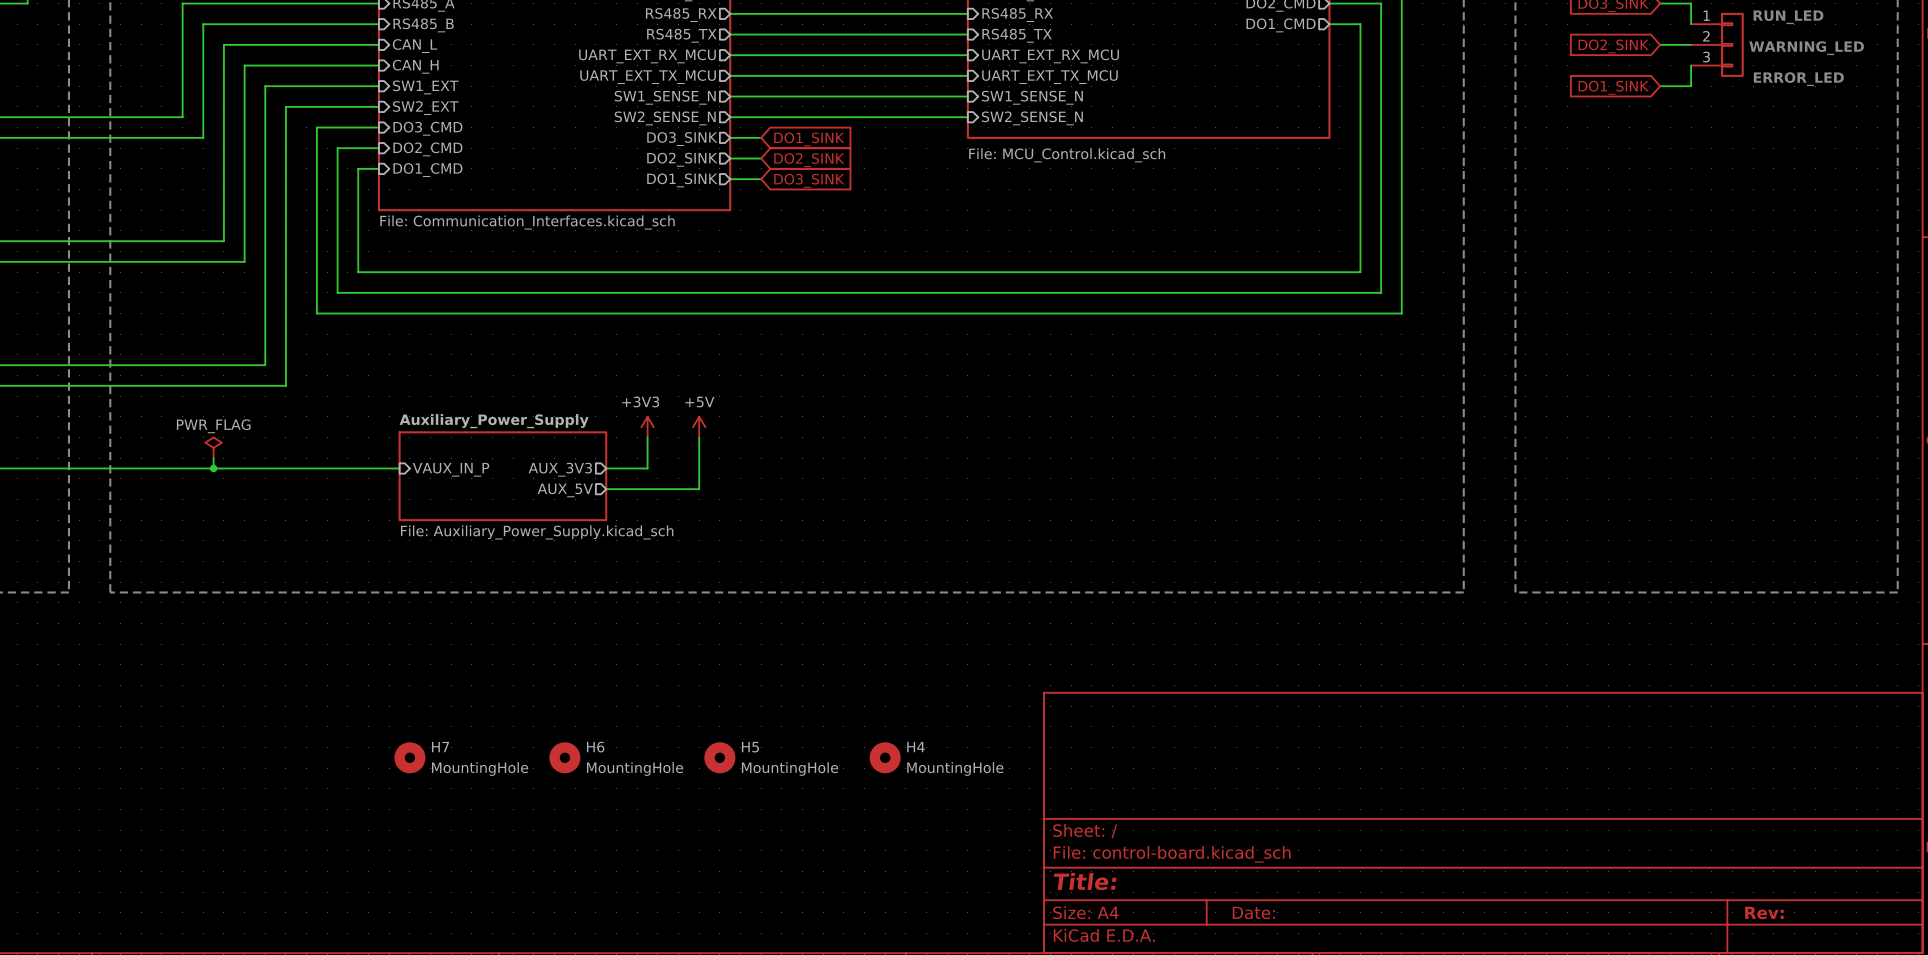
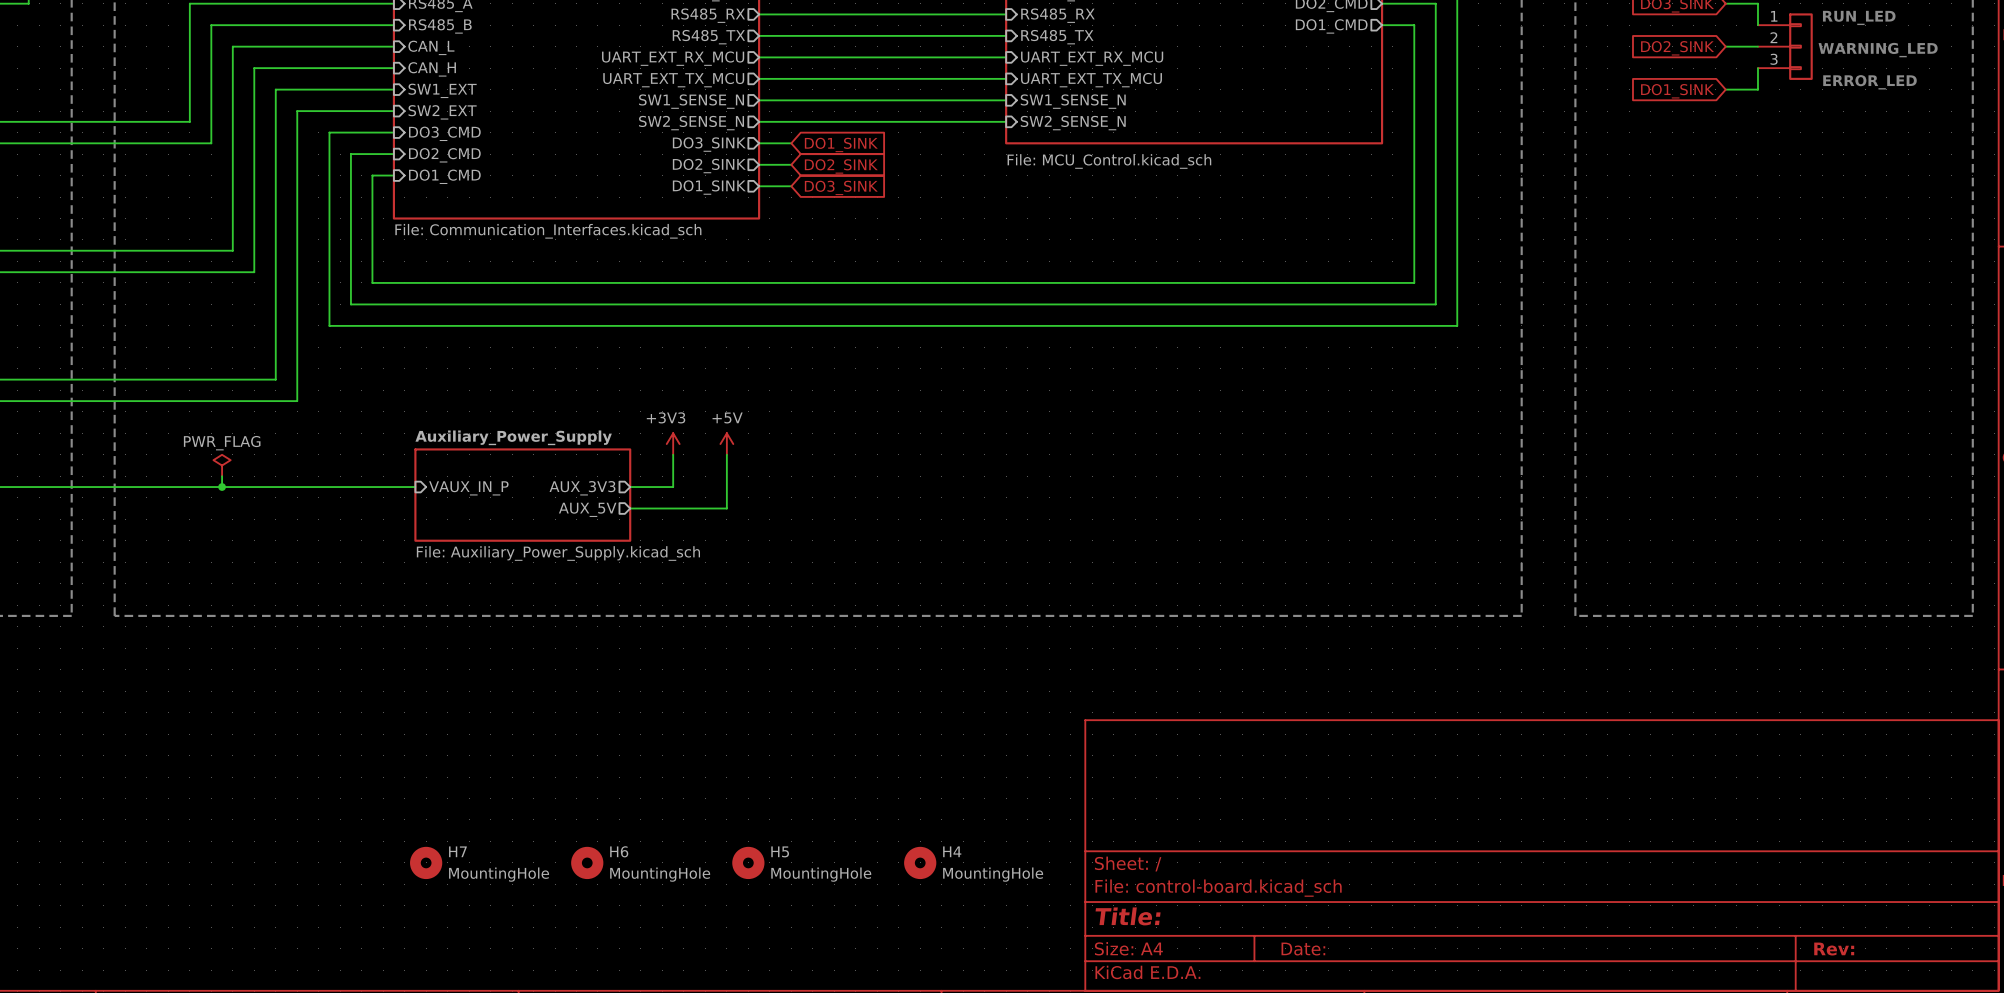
H7 position: (409, 757) -> (426, 862)
H6 position: (564, 757) -> (587, 862)
H5 position: (719, 757) -> (748, 862)
H4 position: (885, 757) -> (920, 862)

